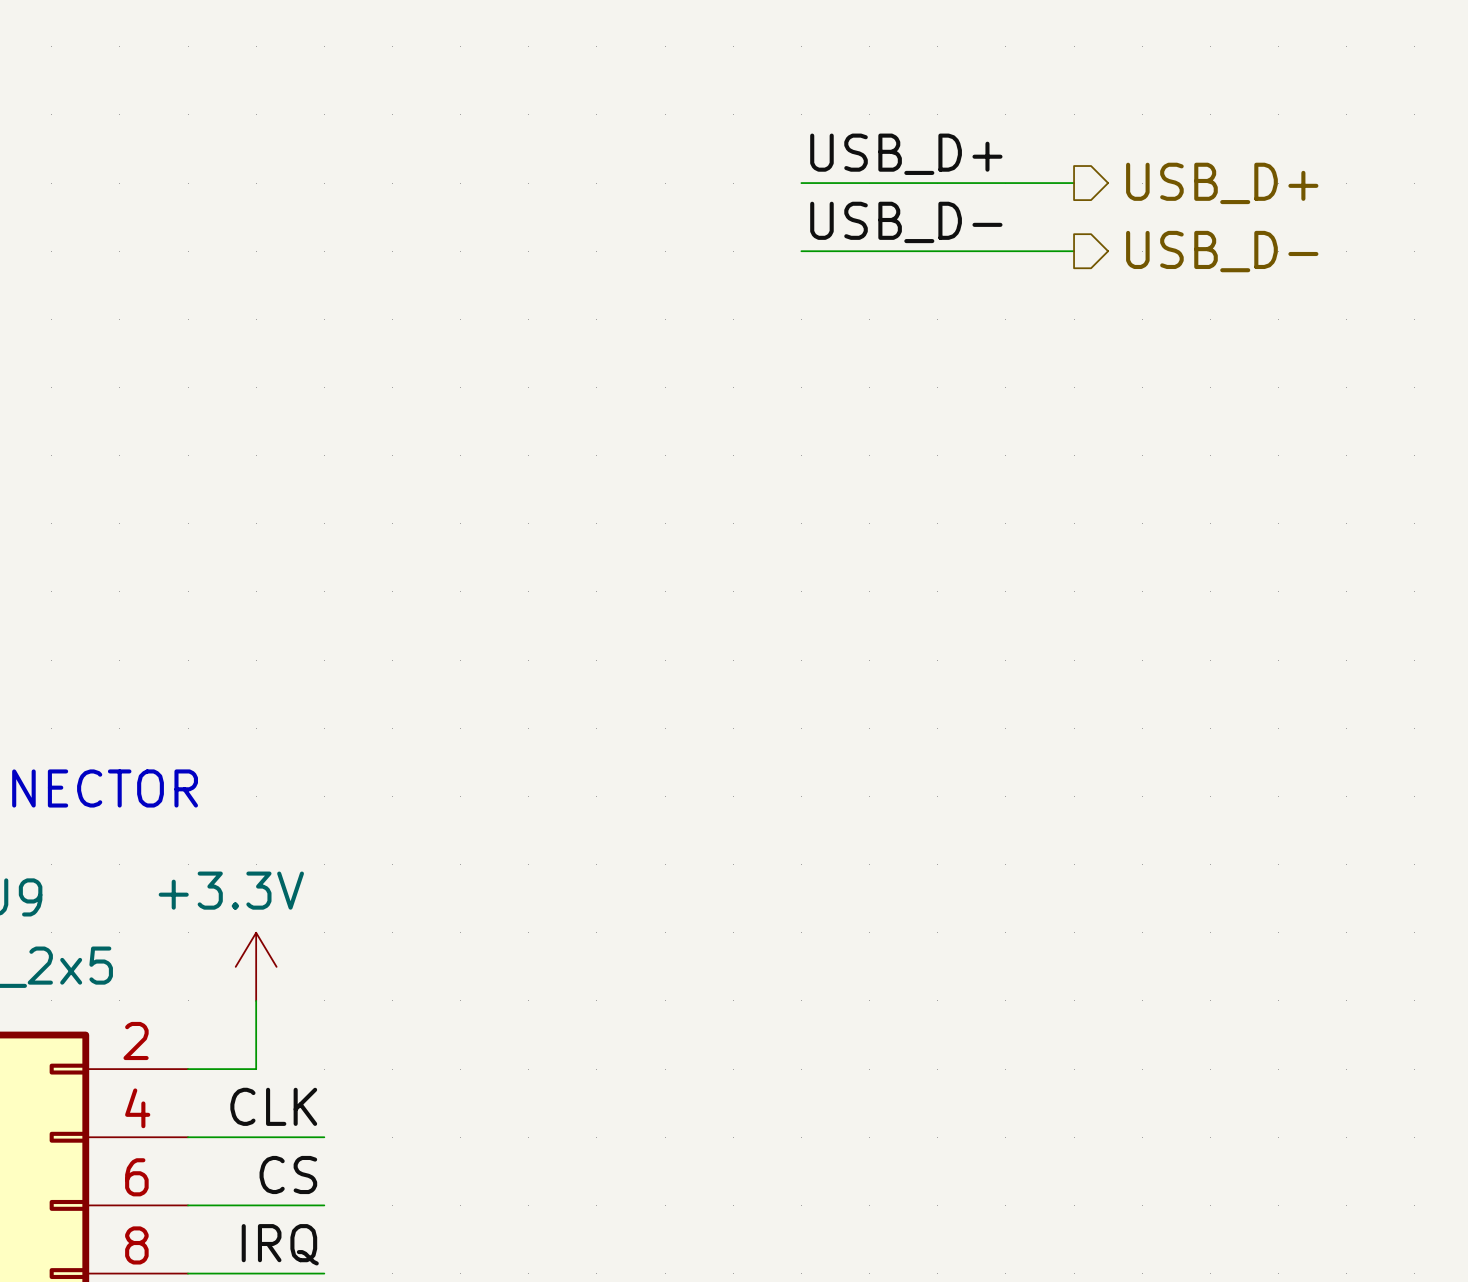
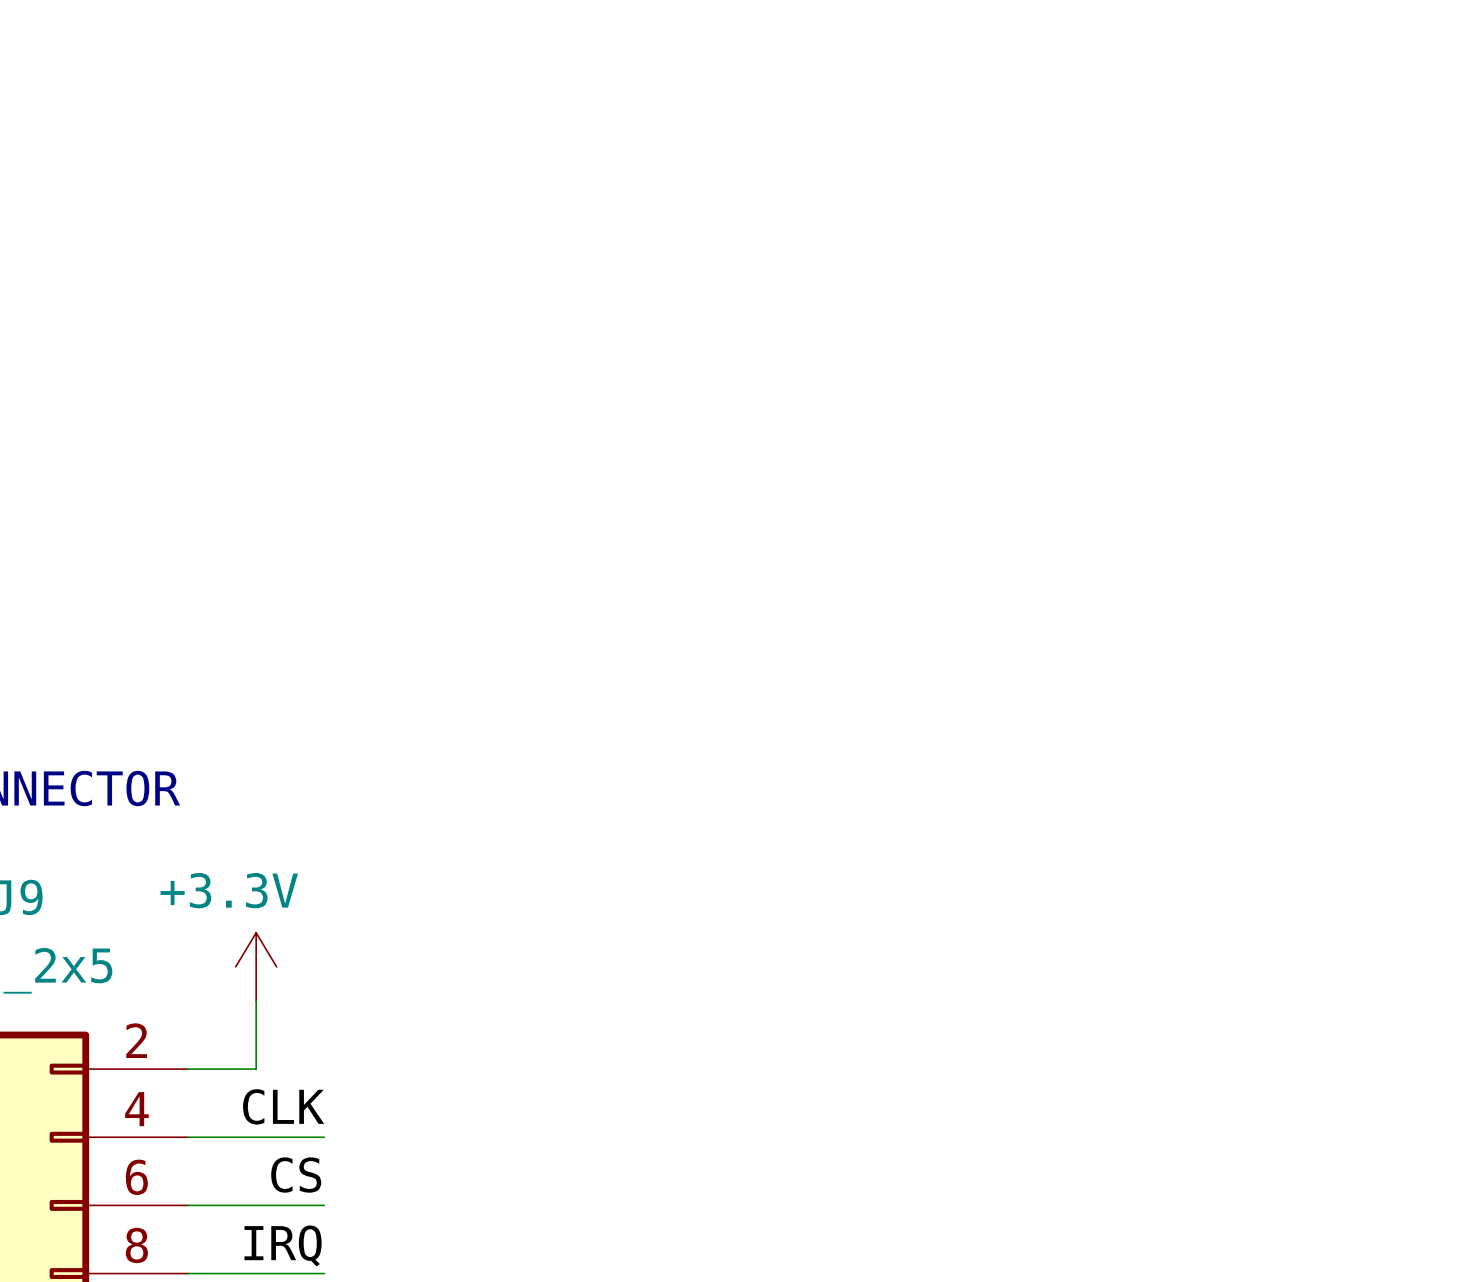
label: USB_D+ (906, 154) -> none
wire: (801, 183) (1074, 183) -> none
hierarchical label: USB_D+ (1222, 183) -> none
label: USB_D- (906, 222) -> none
wire: (801, 251) (1074, 251) -> none
hierarchical label: USB_D- (1222, 251) -> none

